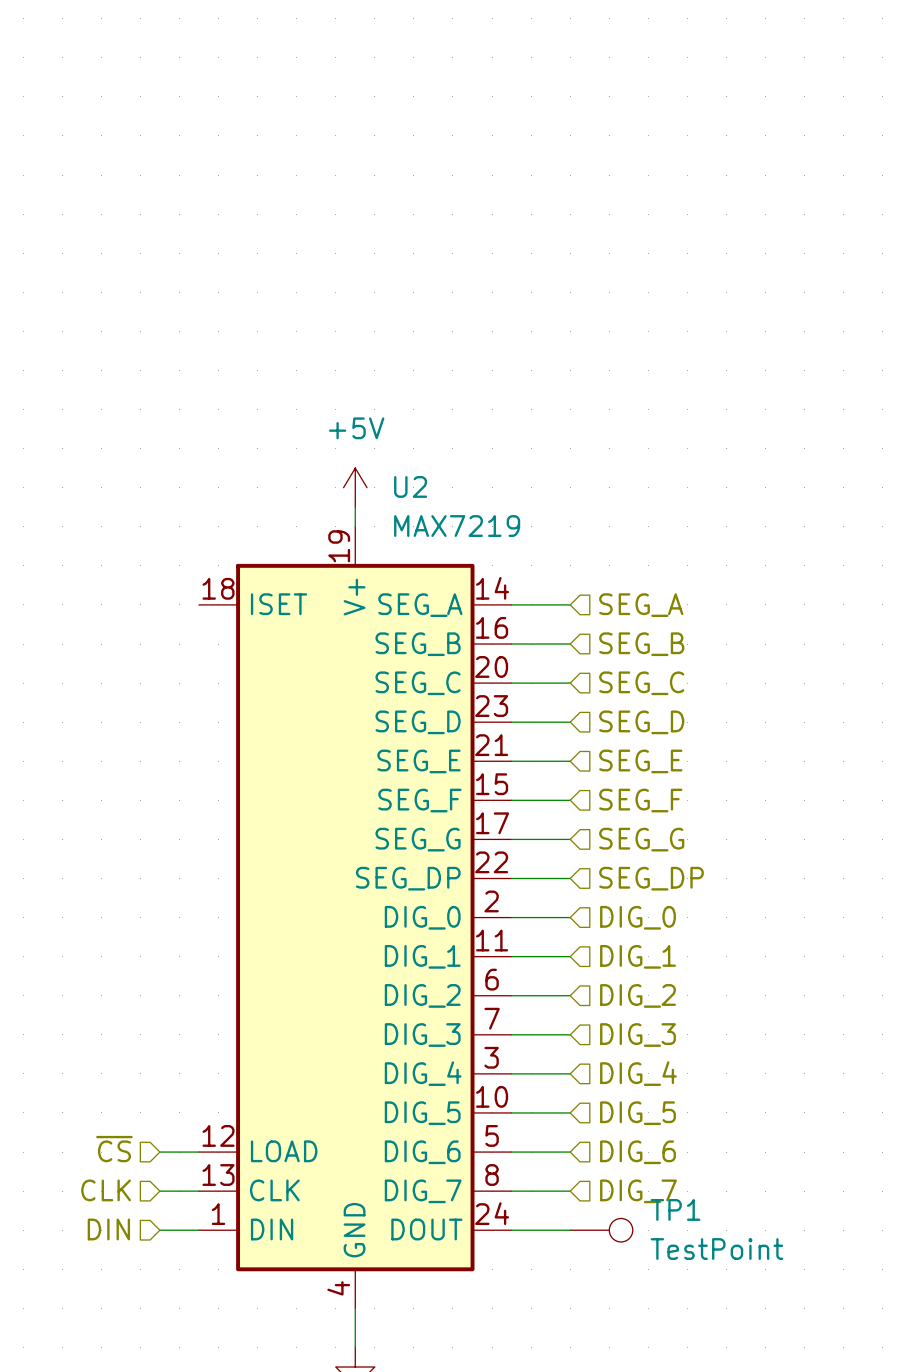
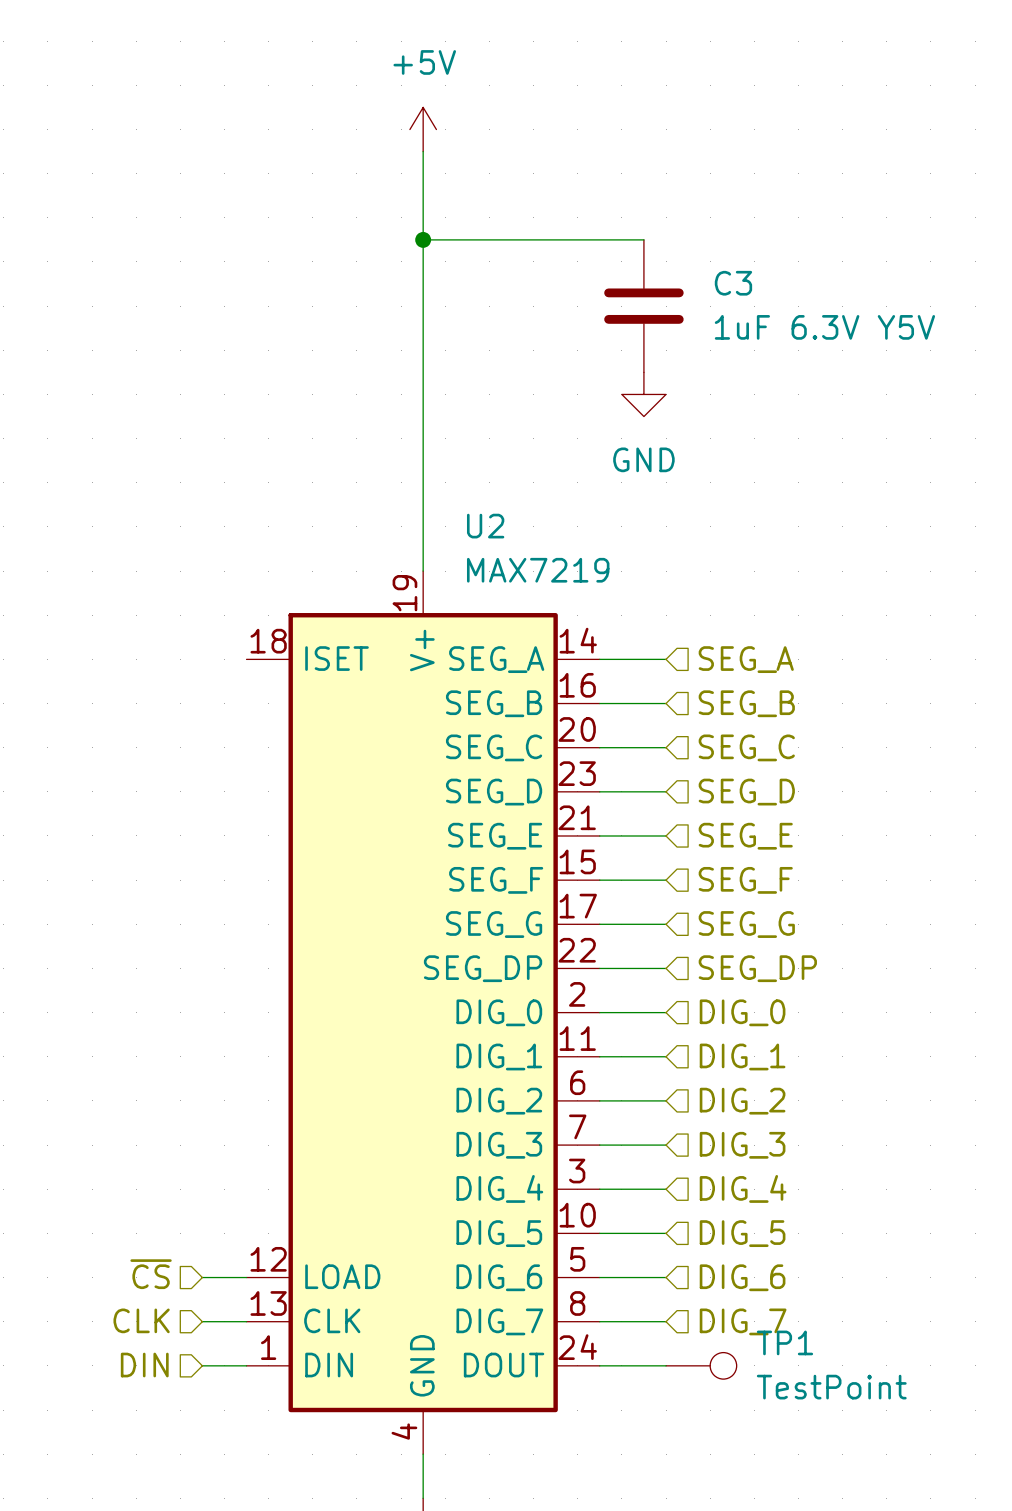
wire: none -> (423, 151) (423, 548)
wire: none -> (423, 239) (643, 239)
junction: none -> (423, 239)
C3: none -> 1uF 6.3V Y5V (643, 306)
power symbol: none -> GND (643, 394)
power symbol position: +5V (355, 487) -> +5V (423, 129)

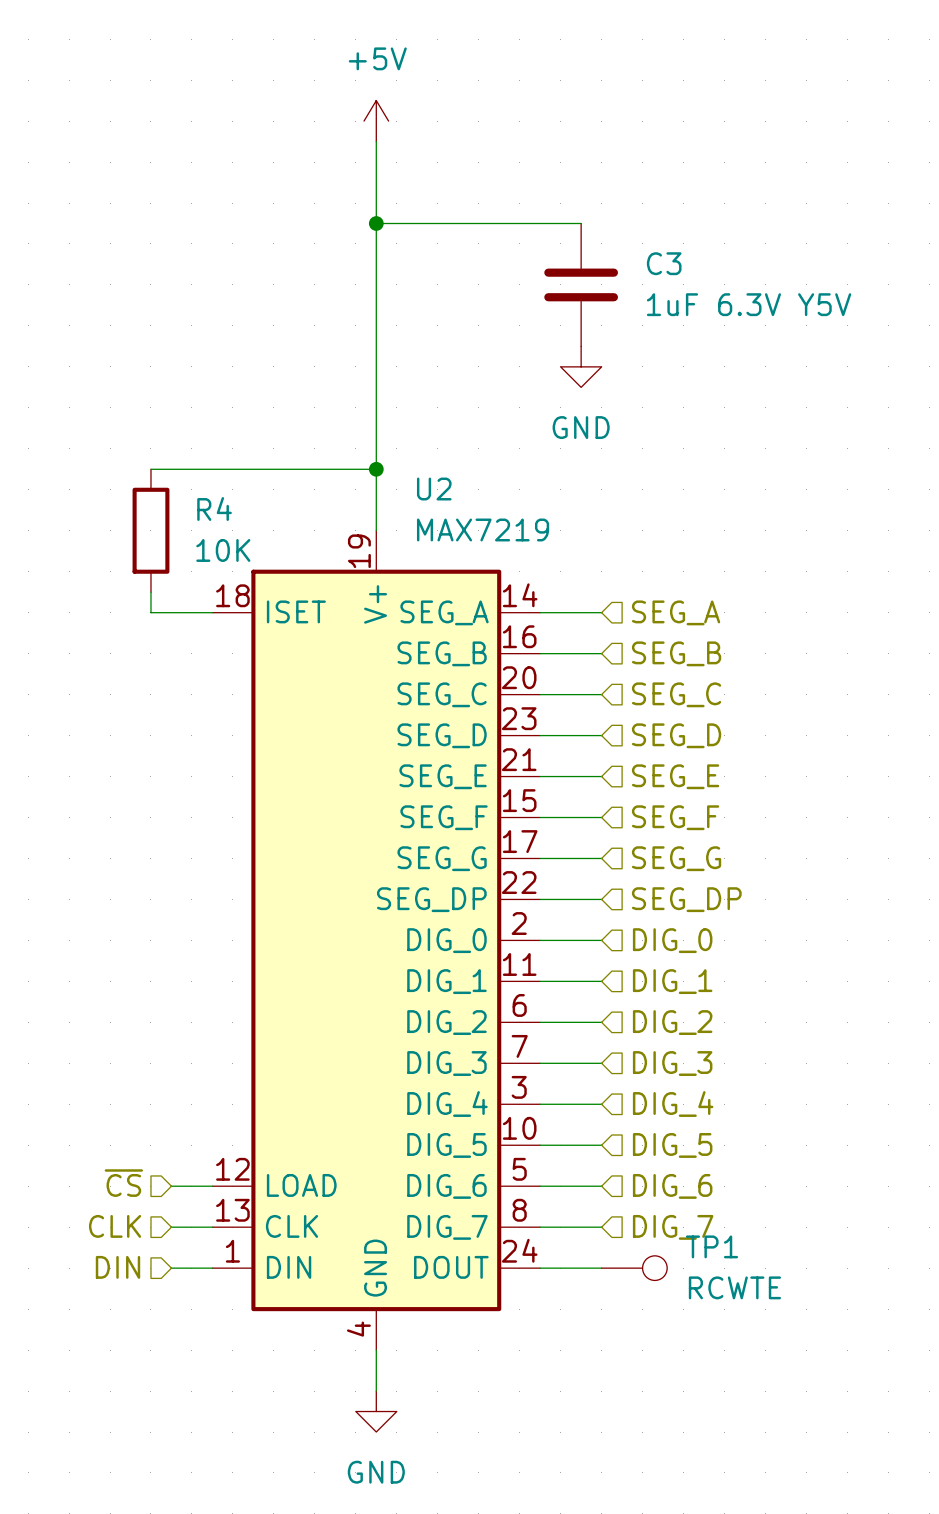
wire: none -> (150, 469) (376, 469)
junction: none -> (376, 469)
R4: none -> 10K (150, 530)
wire: none -> (150, 592) (150, 612) (212, 612)
TP1 value: TestPoint (831, 1387) -> RCWTE (734, 1287)

